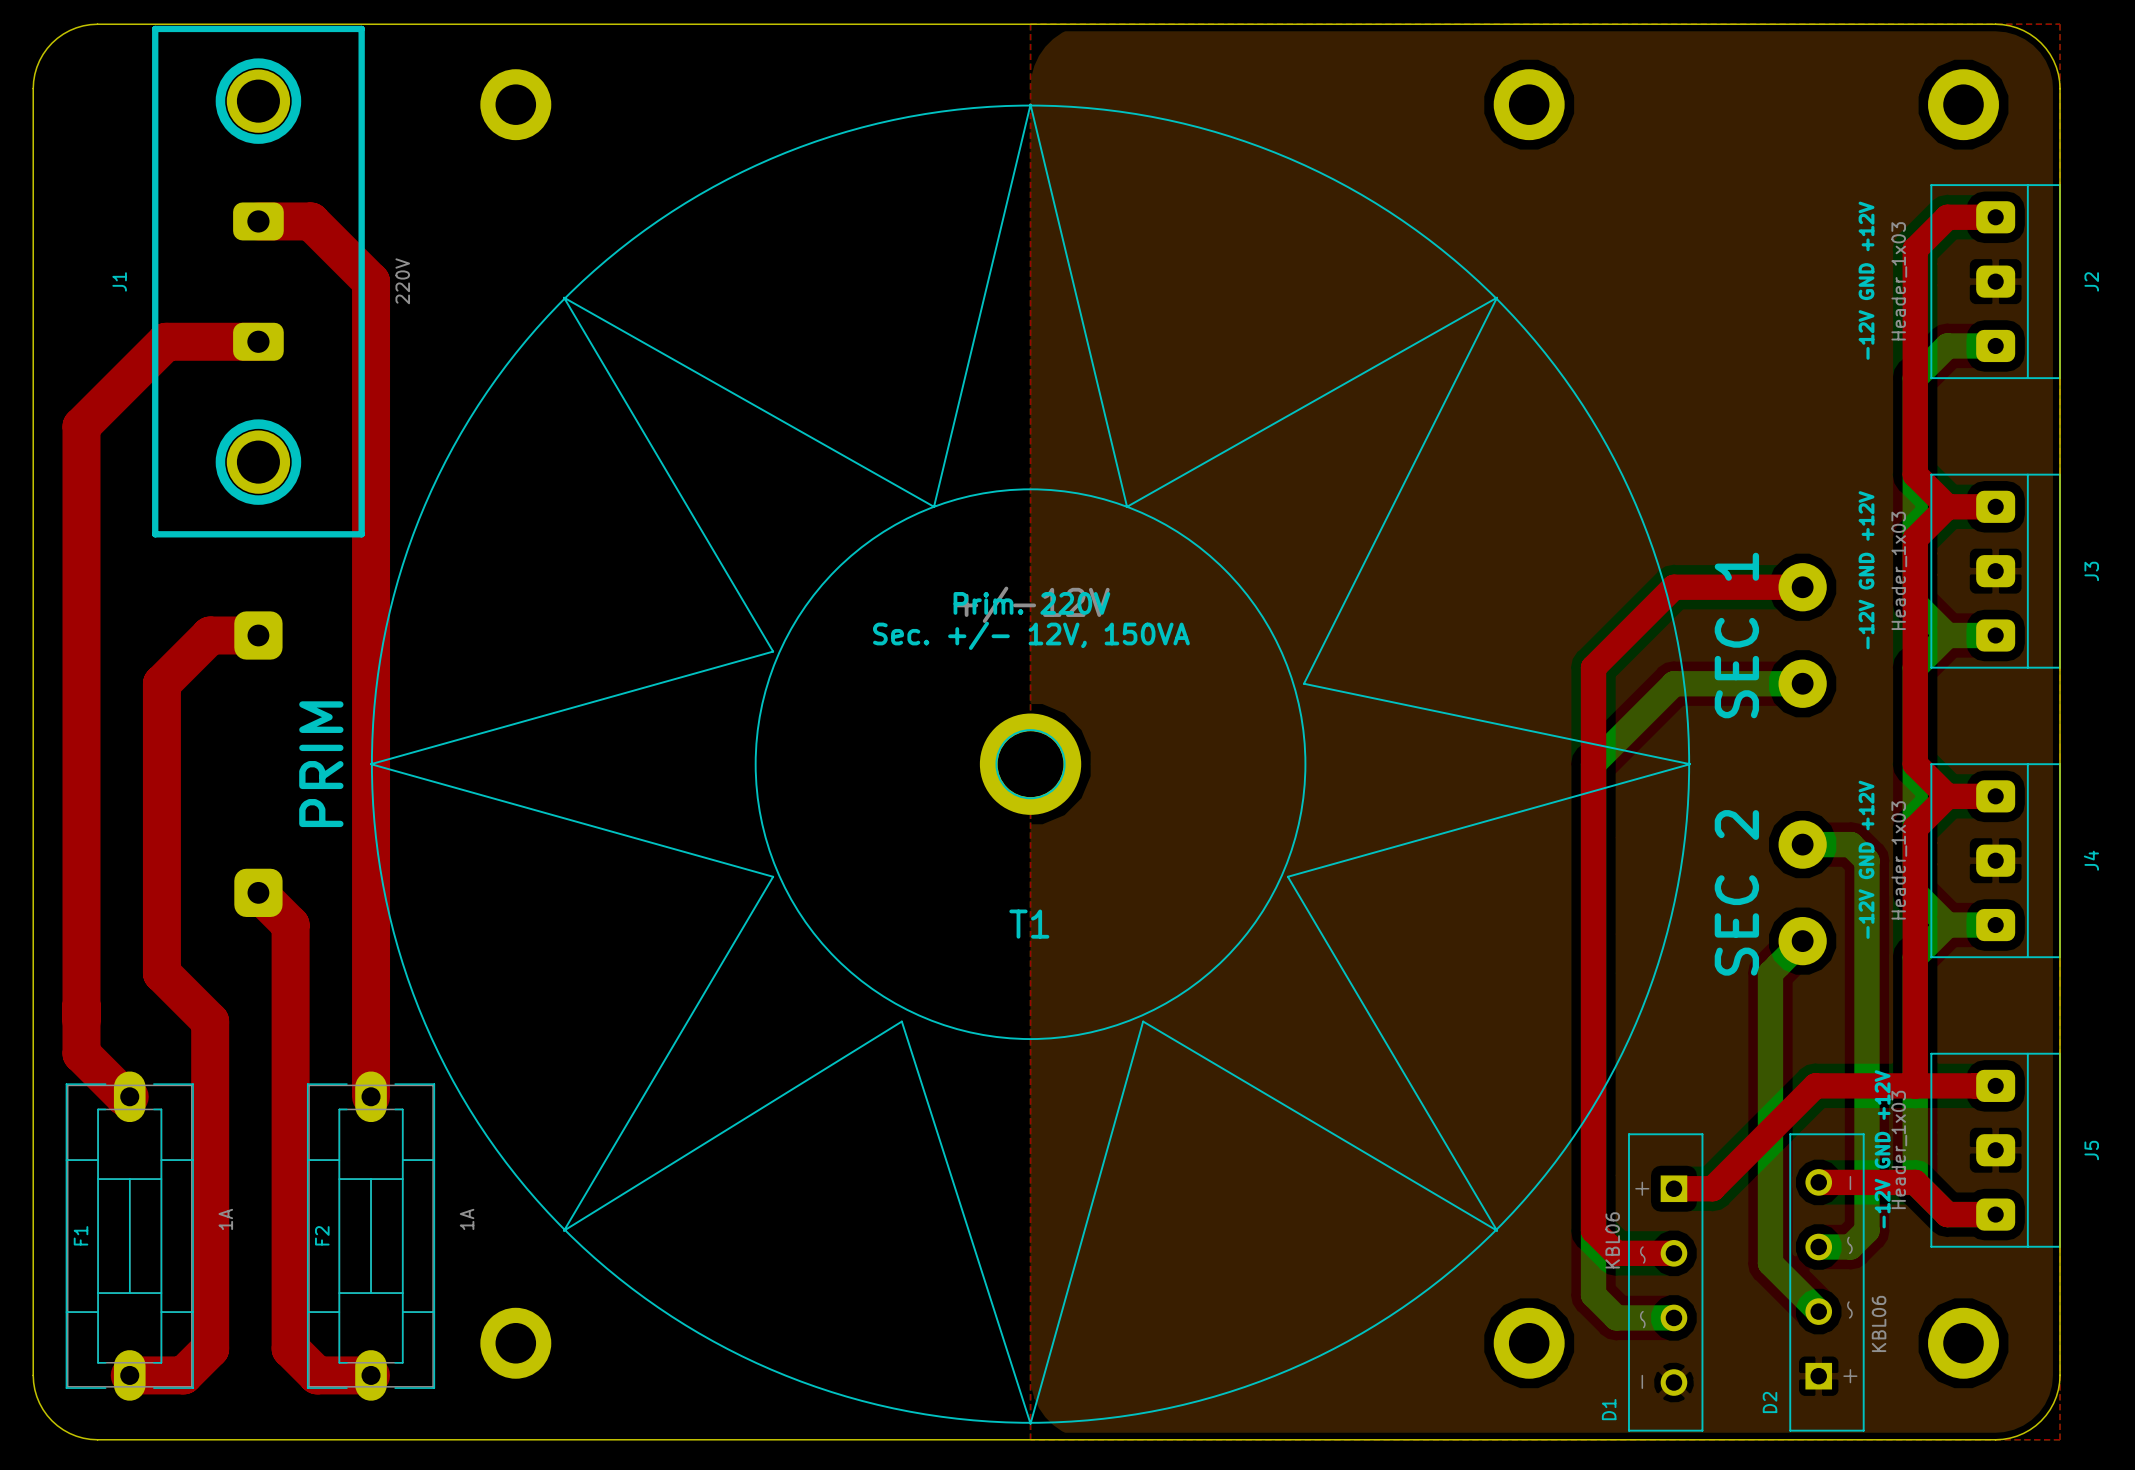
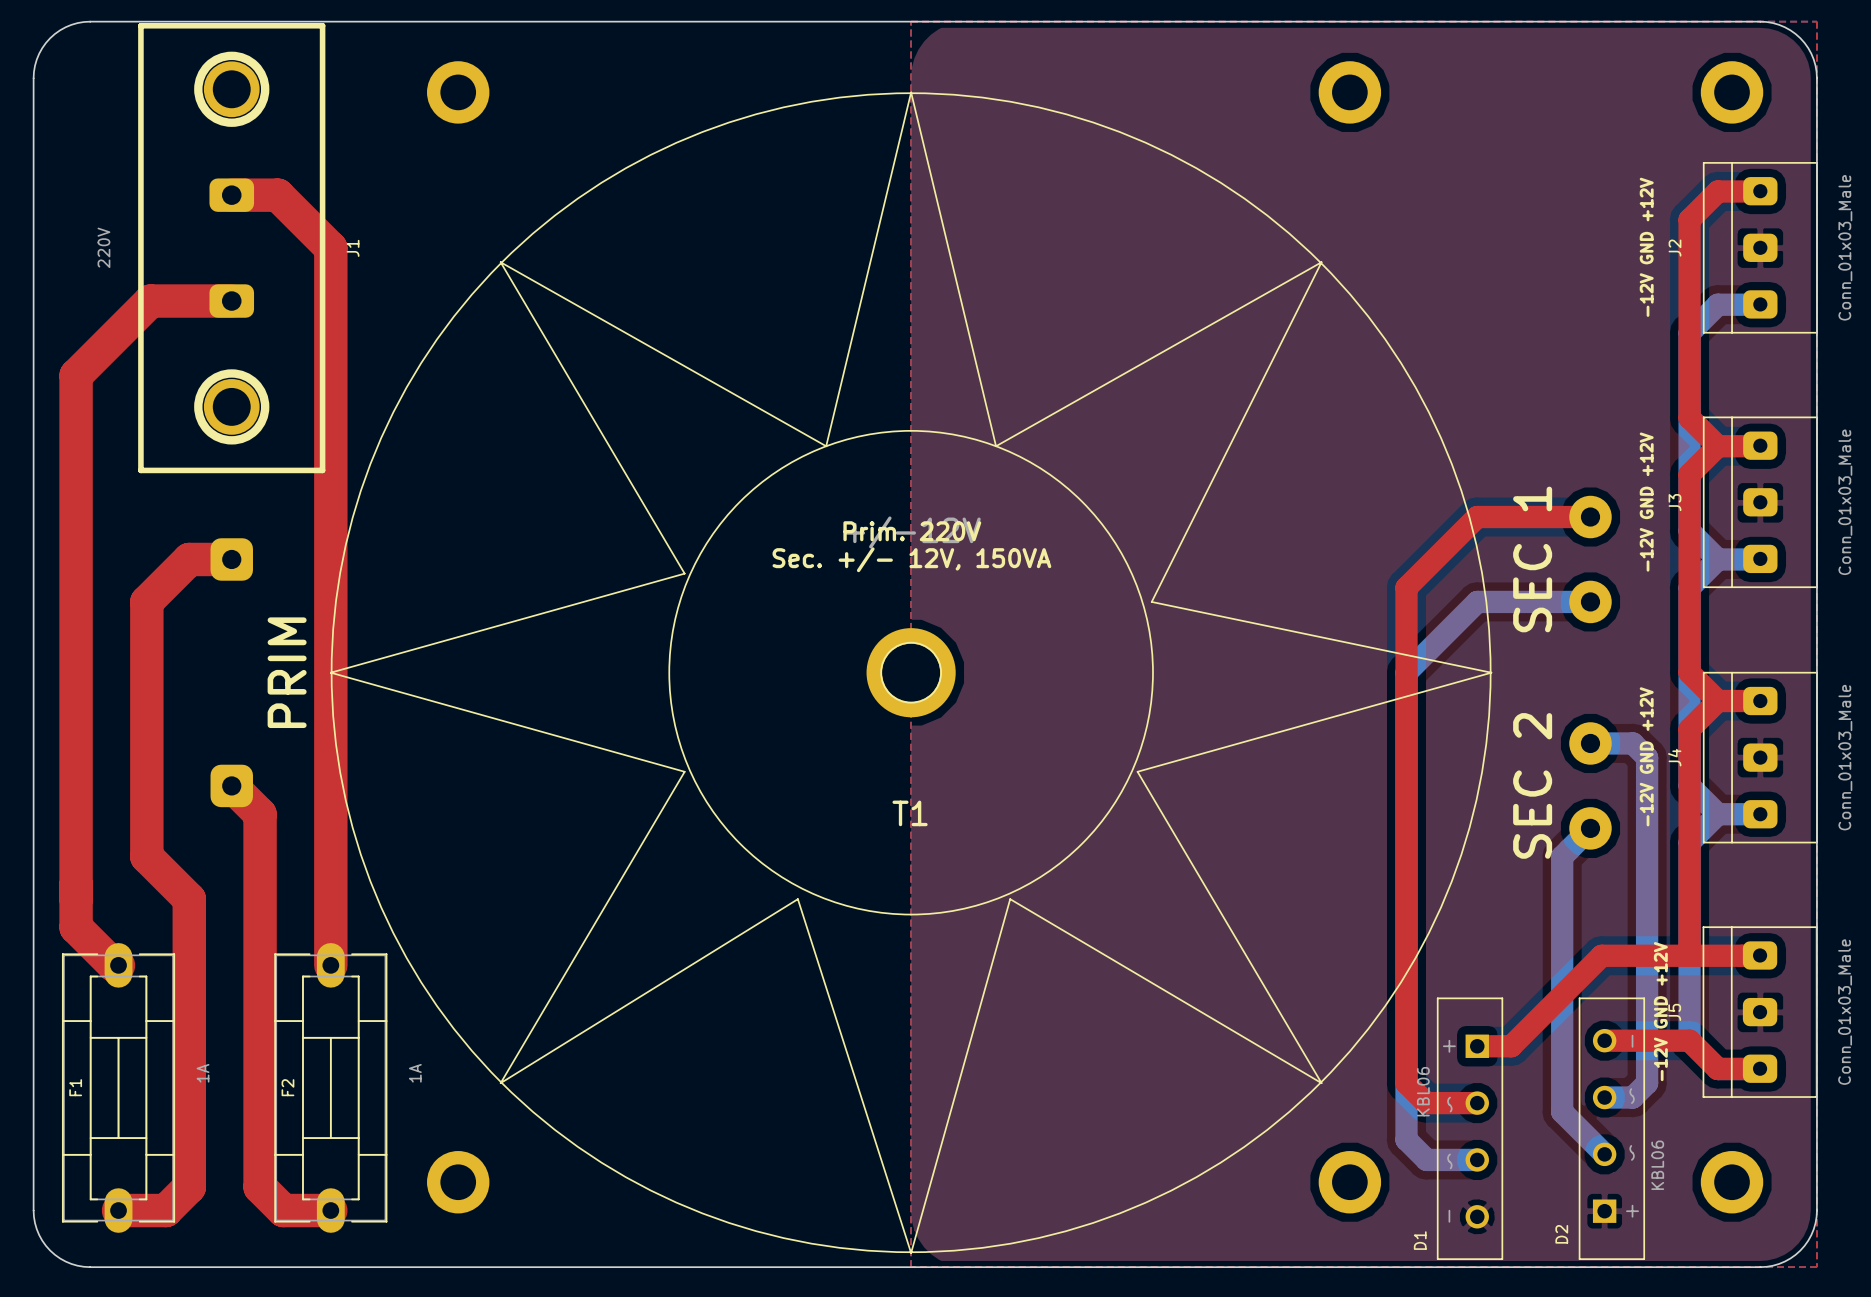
J1 name position: J1 (119, 281) -> J1 (353, 248)
J1 value position: 220V (402, 281) -> 220V (103, 247)
J2 value: Header_1x03 (1899, 281) -> Conn_01x03_Male (1845, 247)
J2 rotation: 0° (1995, 281) -> 180° (1760, 247)
J3 value: Header_1x03 (1899, 570) -> Conn_01x03_Male (1845, 502)
J3 rotation: 0° (1995, 571) -> 180° (1760, 502)
J4 value: Header_1x03 (1899, 860) -> Conn_01x03_Male (1845, 757)
J4 rotation: 0° (1995, 860) -> 180° (1760, 757)
J5 value: Header_1x03 (1899, 1149) -> Conn_01x03_Male (1845, 1012)
J5 rotation: 0° (1995, 1150) -> 180° (1760, 1012)

